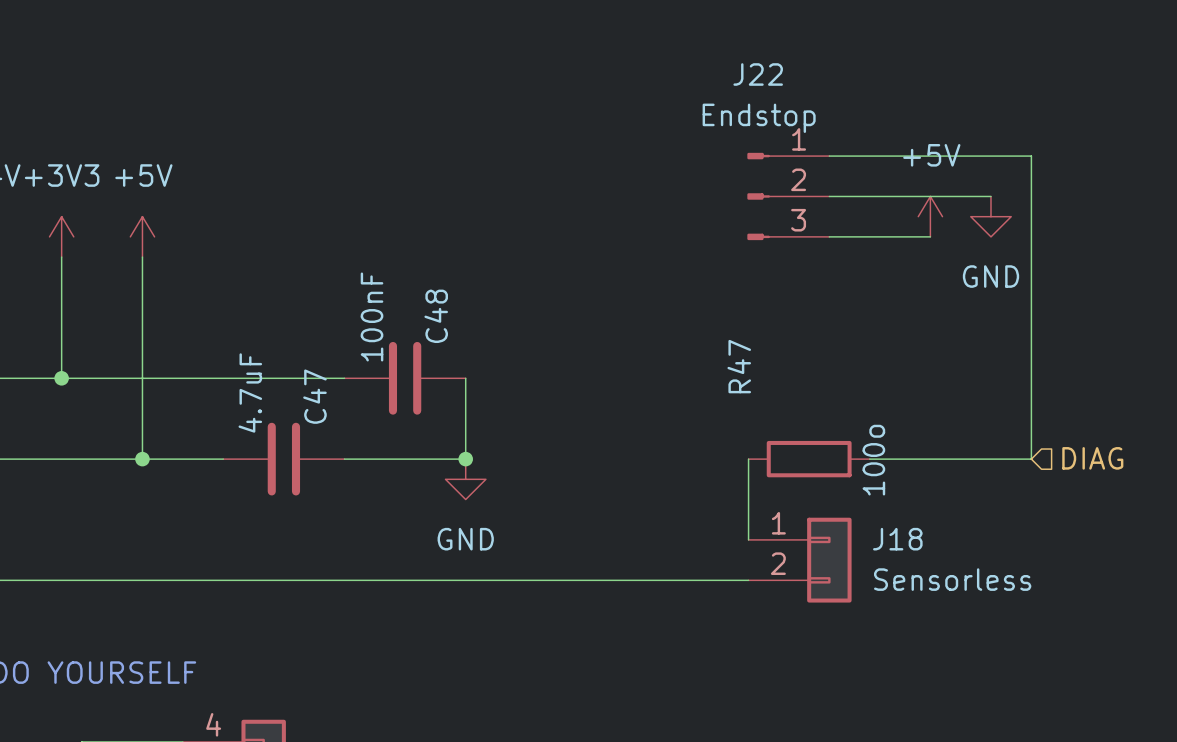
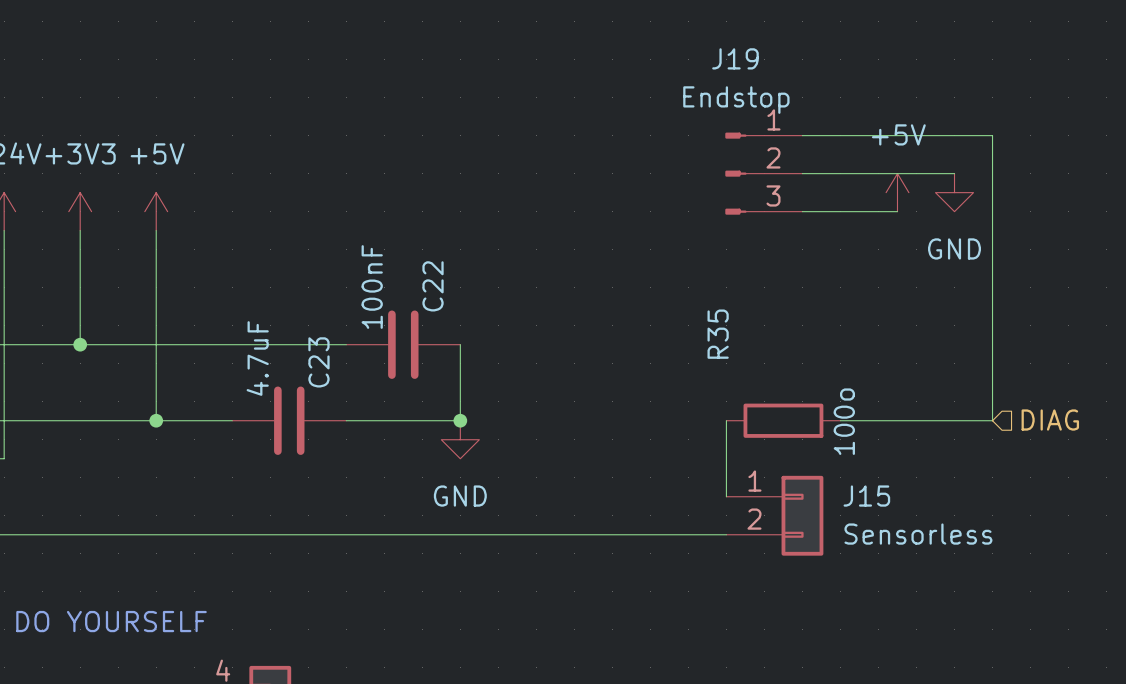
J22 name: J22 (758, 74) -> J19 (735, 58)
C48 name: C48 (436, 316) -> C22 (433, 286)
R47 name: R47 (739, 366) -> R35 (718, 334)
C47 name: C47 (314, 396) -> C23 (318, 362)
J18 name: J18 (897, 539) -> J15 (866, 496)

